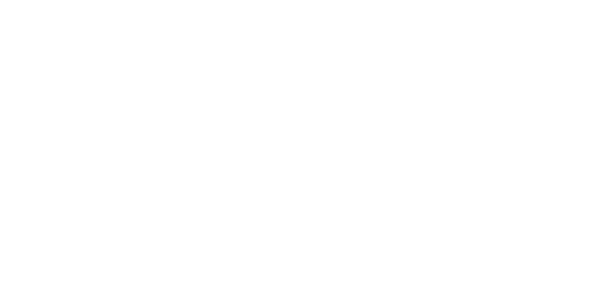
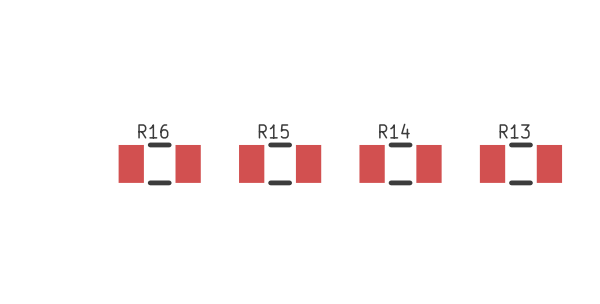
R16: none -> (159, 163)
R15: none -> (280, 163)
R14: none -> (400, 163)
R13: none -> (520, 163)

